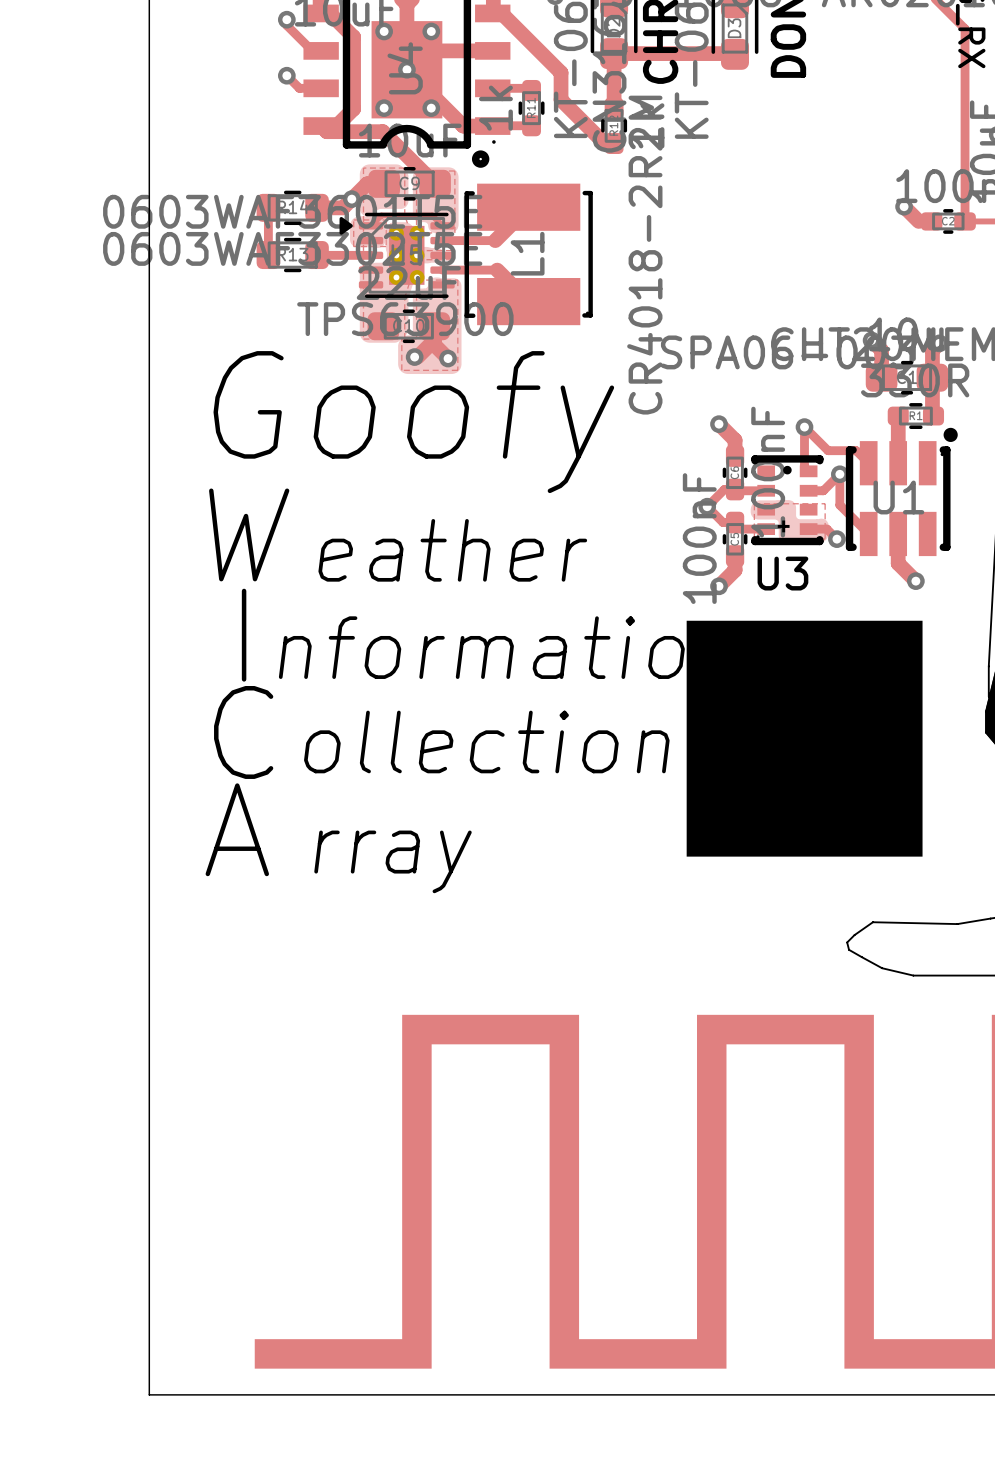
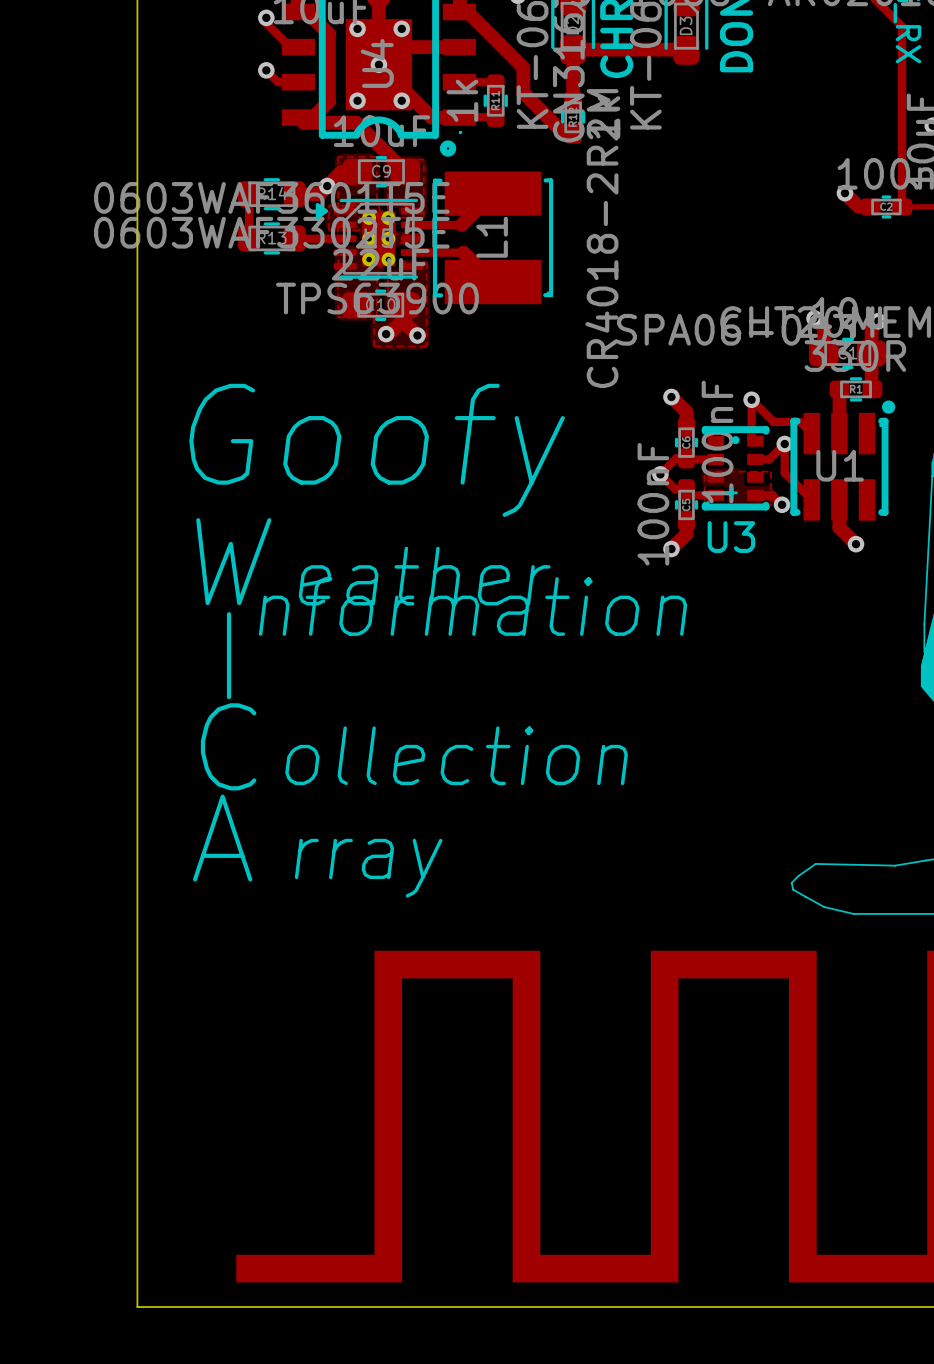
text position: Goofy (413, 422) -> Goofy (377, 450)
text position: W (249, 534) -> W (233, 561)
text position: eather (452, 550) -> eather (424, 576)
drawing: [686, 620, 923, 857] -> none
text position: I (244, 635) -> I (229, 655)
text position: C (243, 732) -> C (228, 746)
text position: ollection (486, 741) -> ollection (456, 755)
text position: A (237, 829) -> A (222, 838)
text position: rray (393, 861) -> rray (368, 868)

